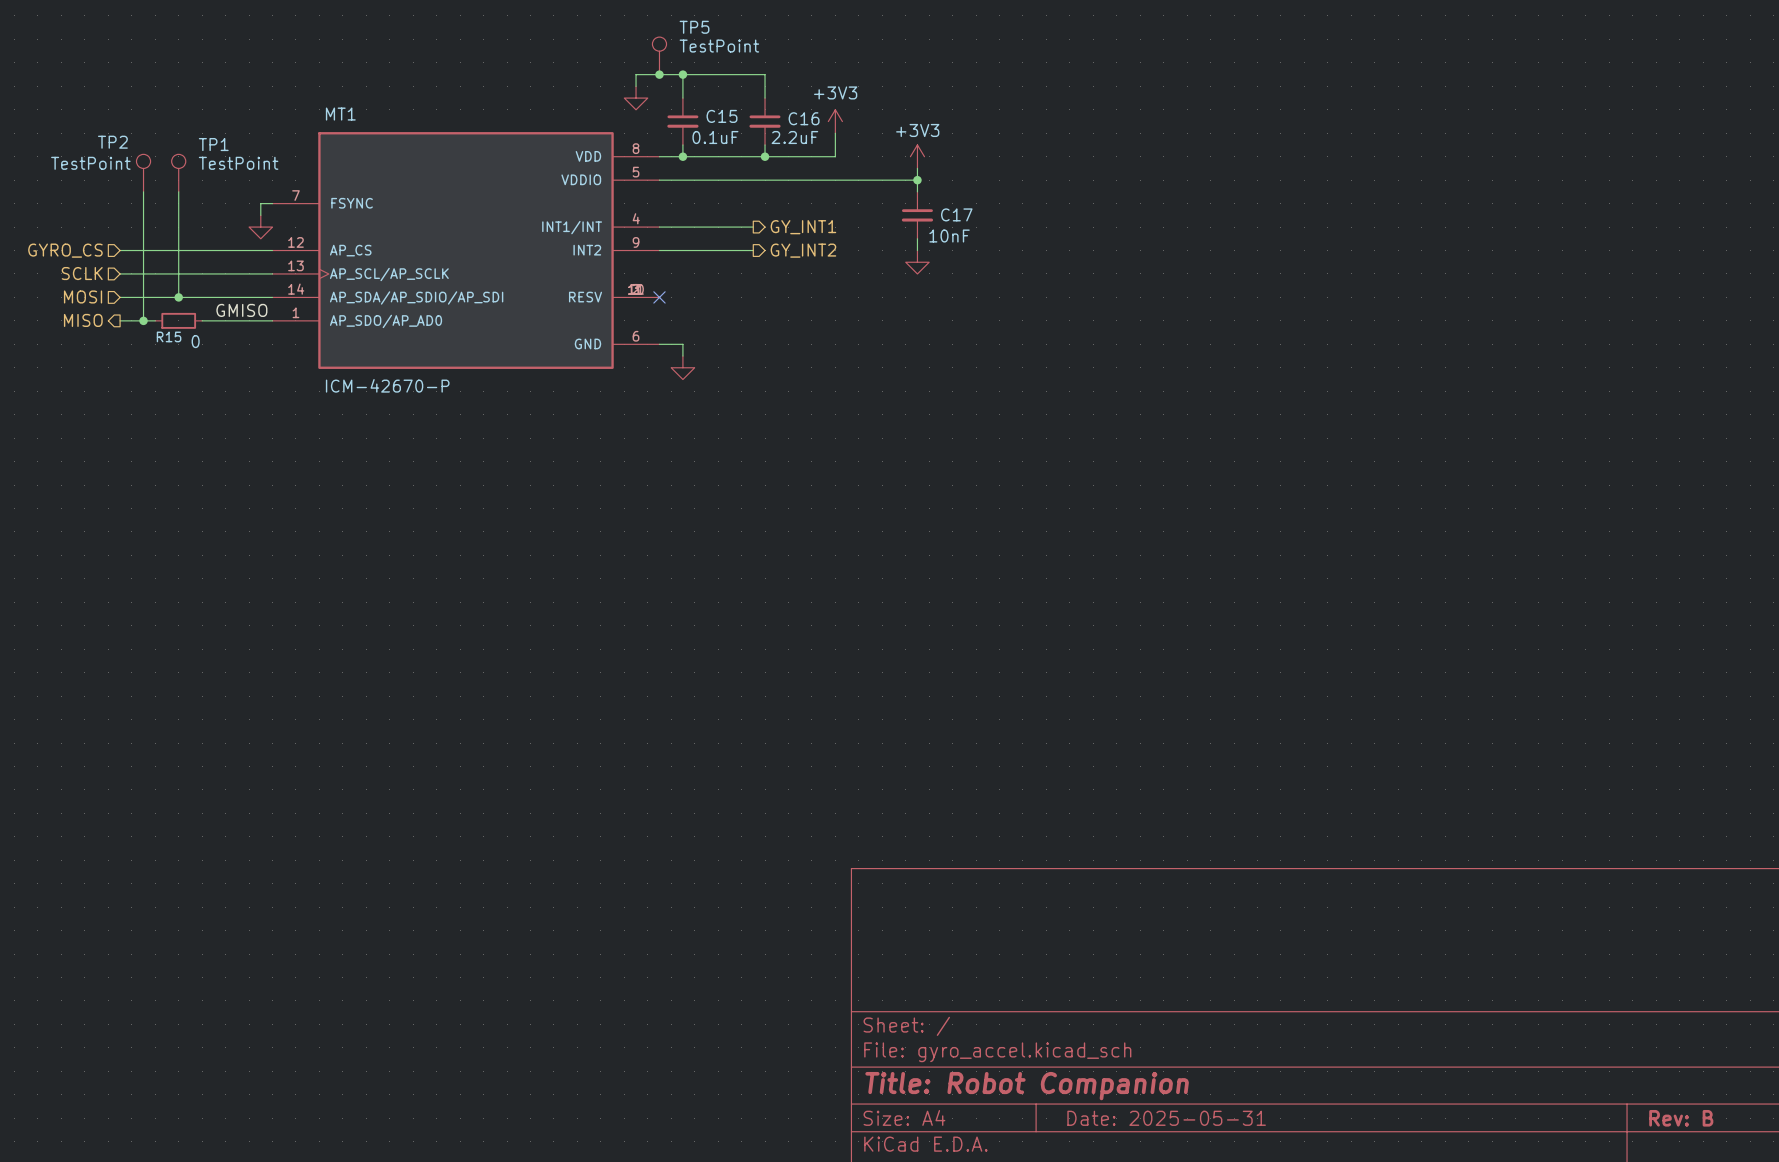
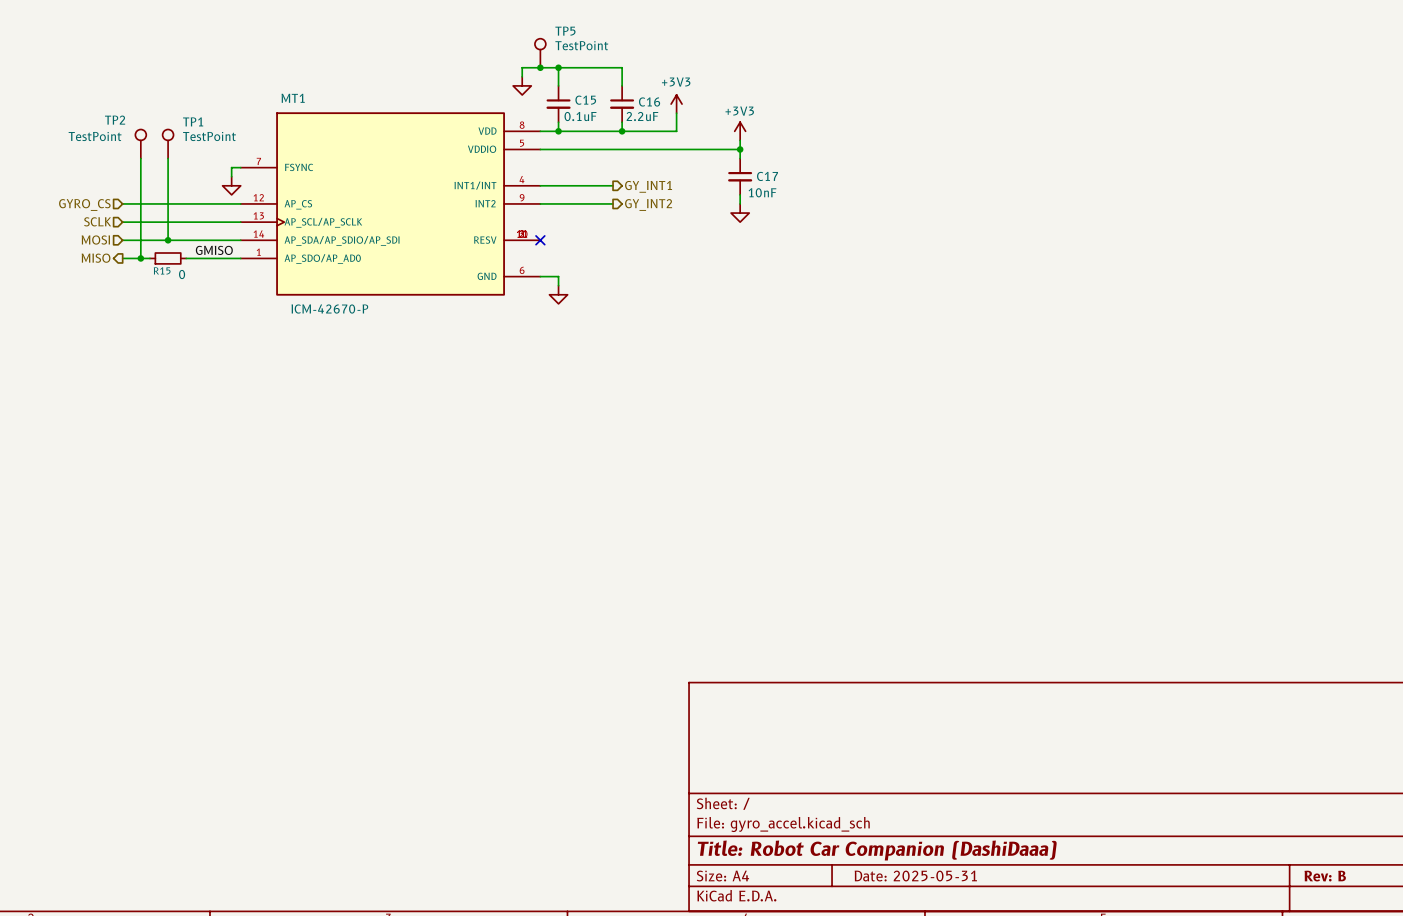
title block: Title: Robot Companion (1027, 1086) -> Title: Robot Car Companion (DashiDaaa) (877, 850)

